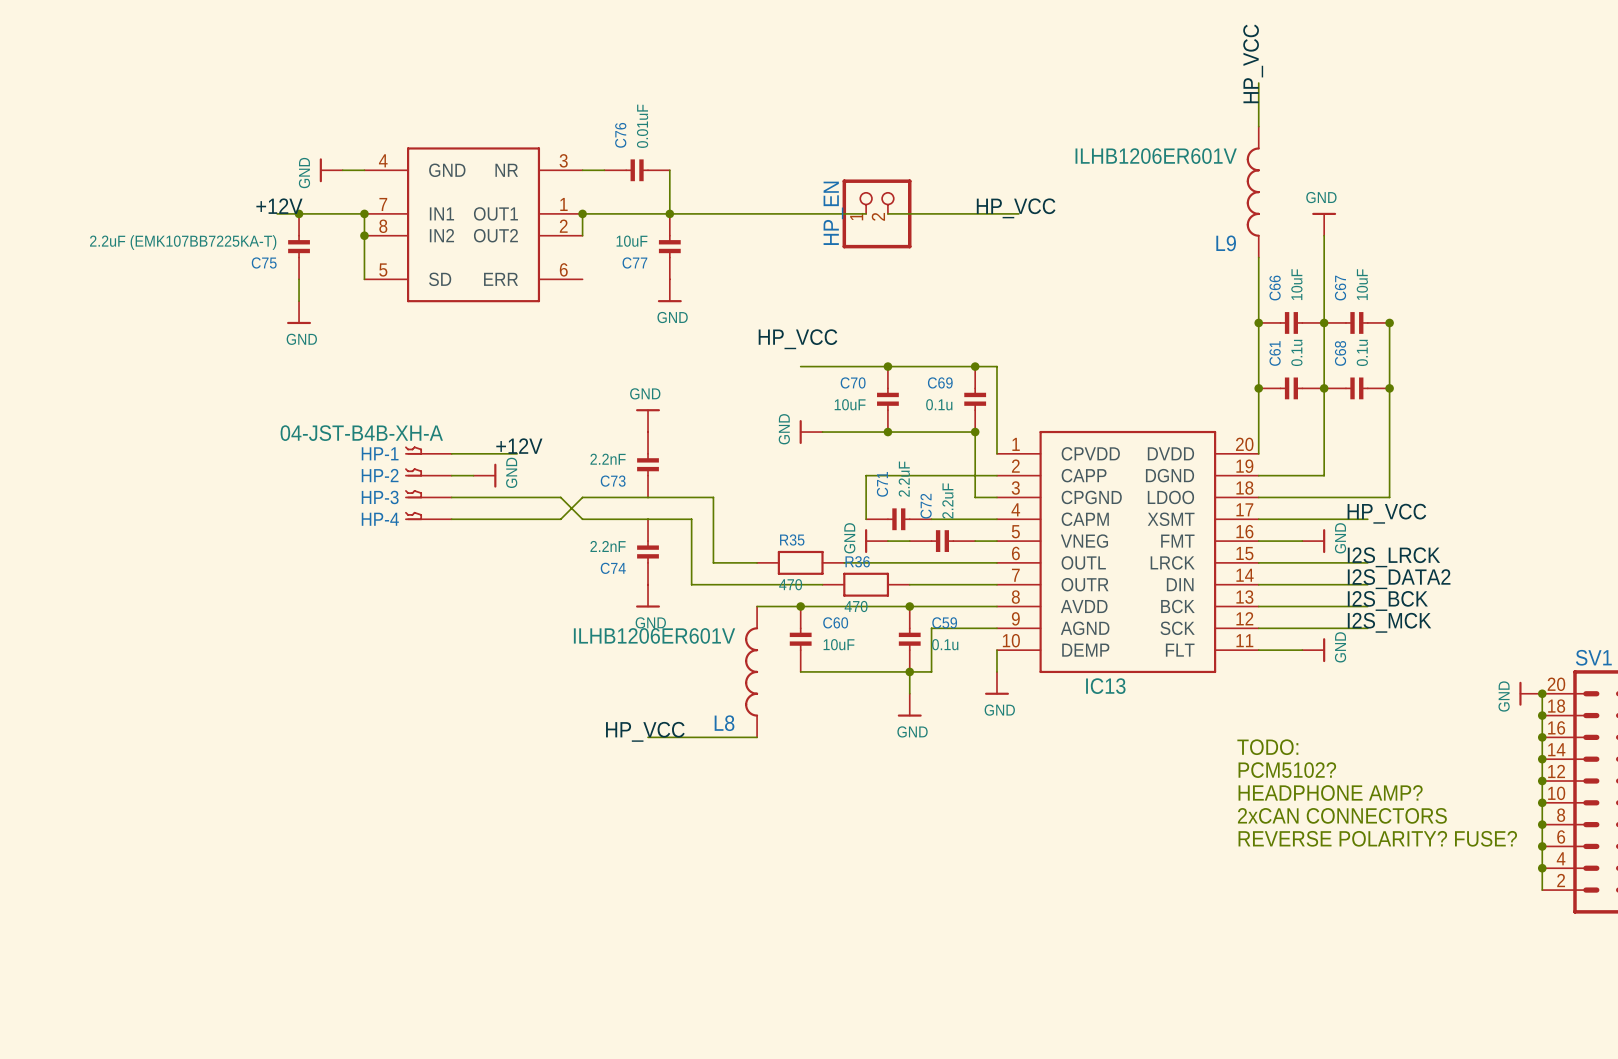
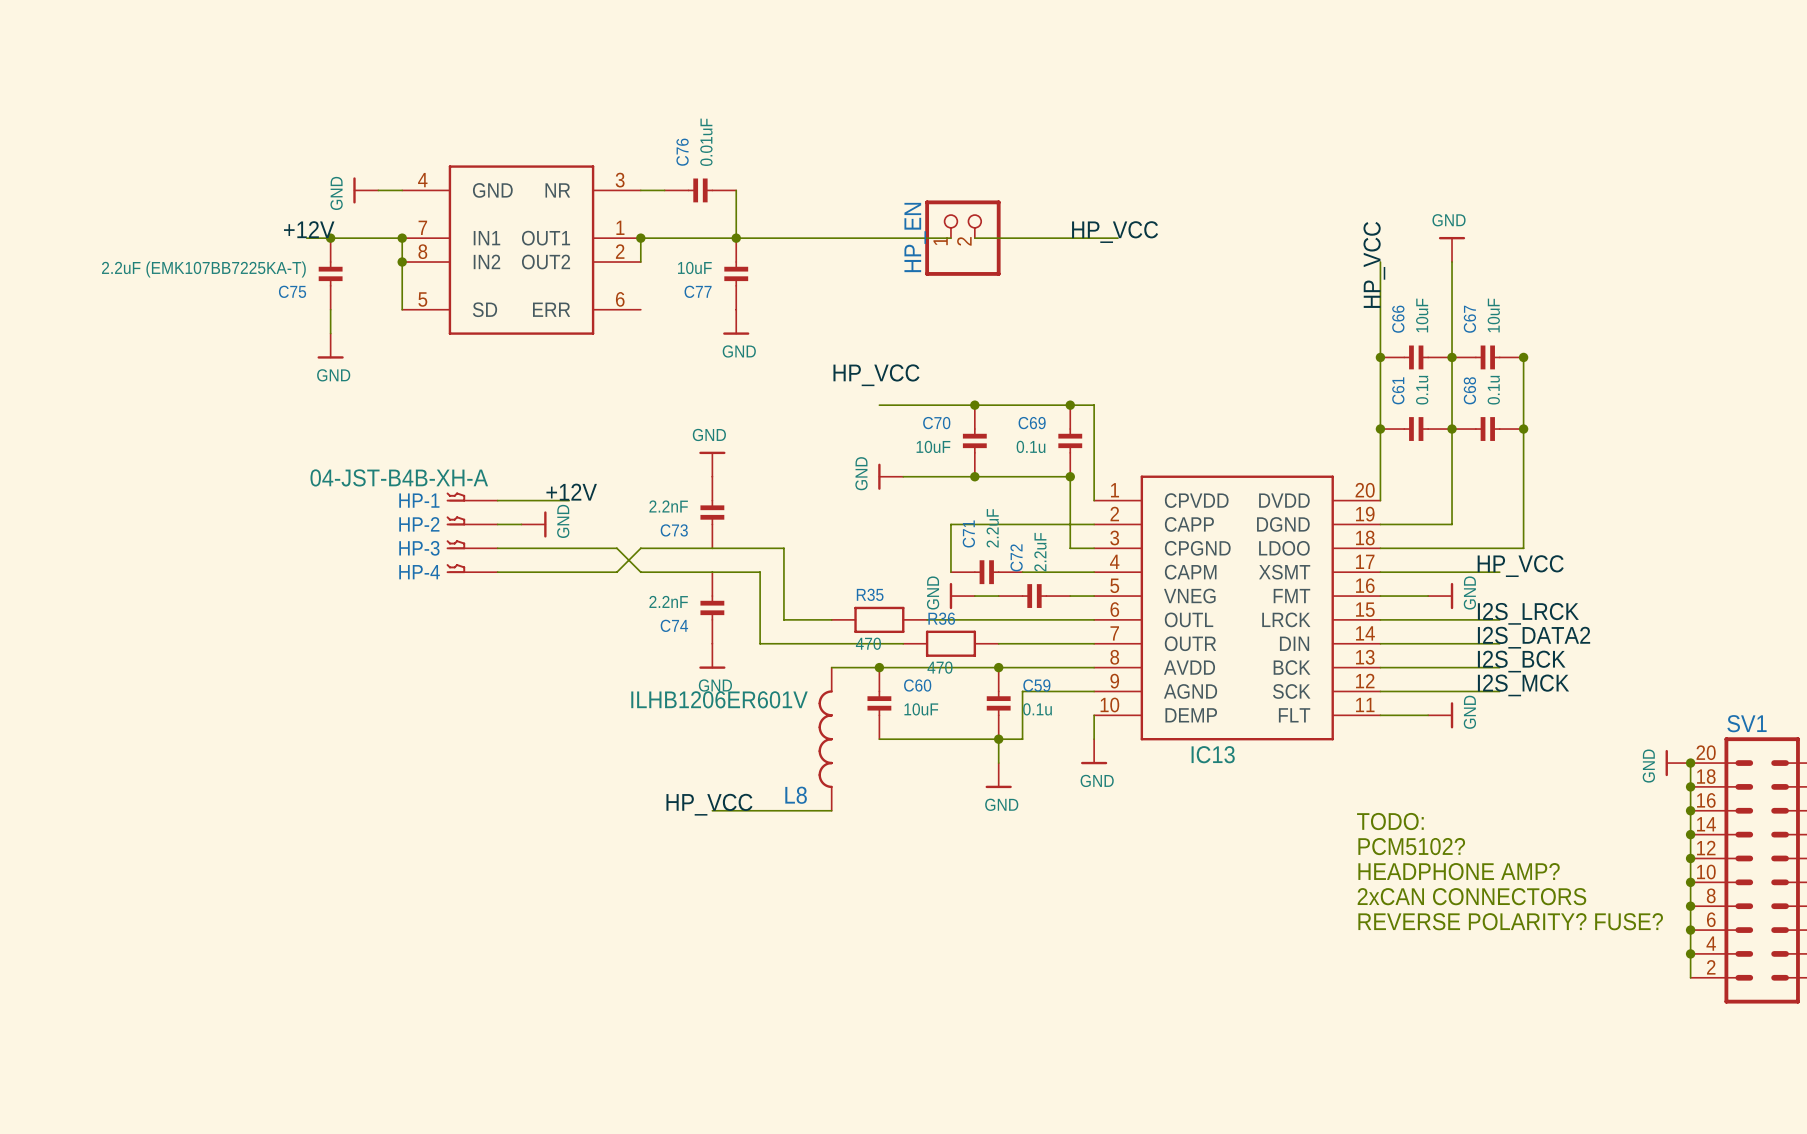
label position: HP_VCC (1253, 63) -> HP_VCC (1374, 264)
wire: (1258, 83) (1258, 126) -> none
L9: ILHB1206ER601V (1253, 192) -> none

